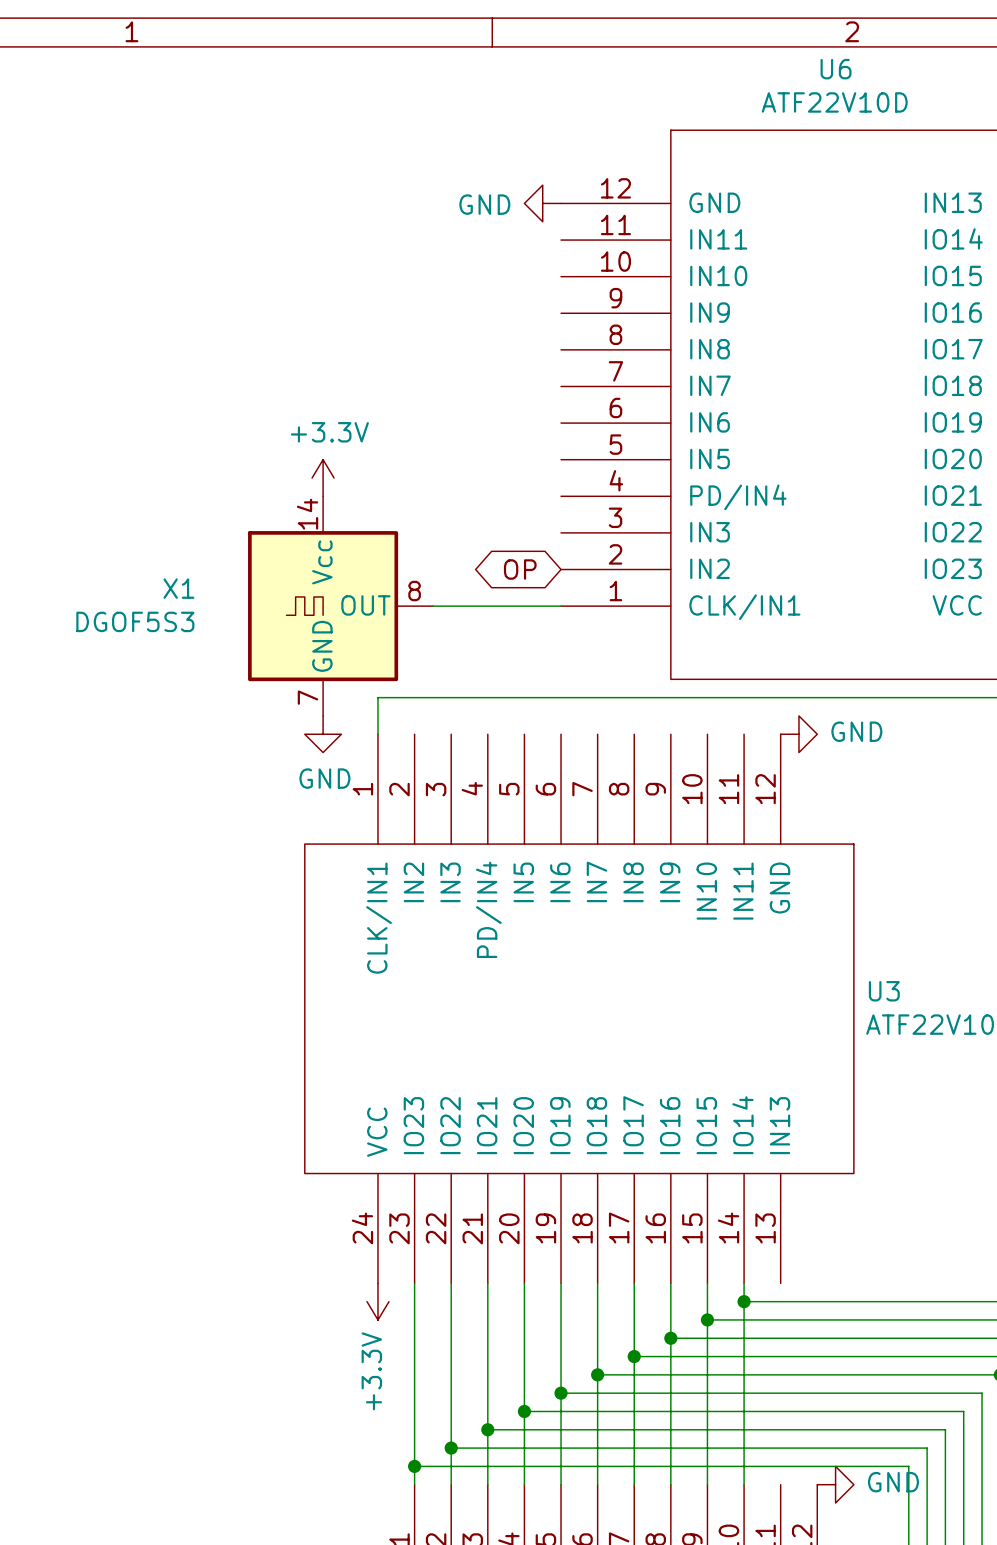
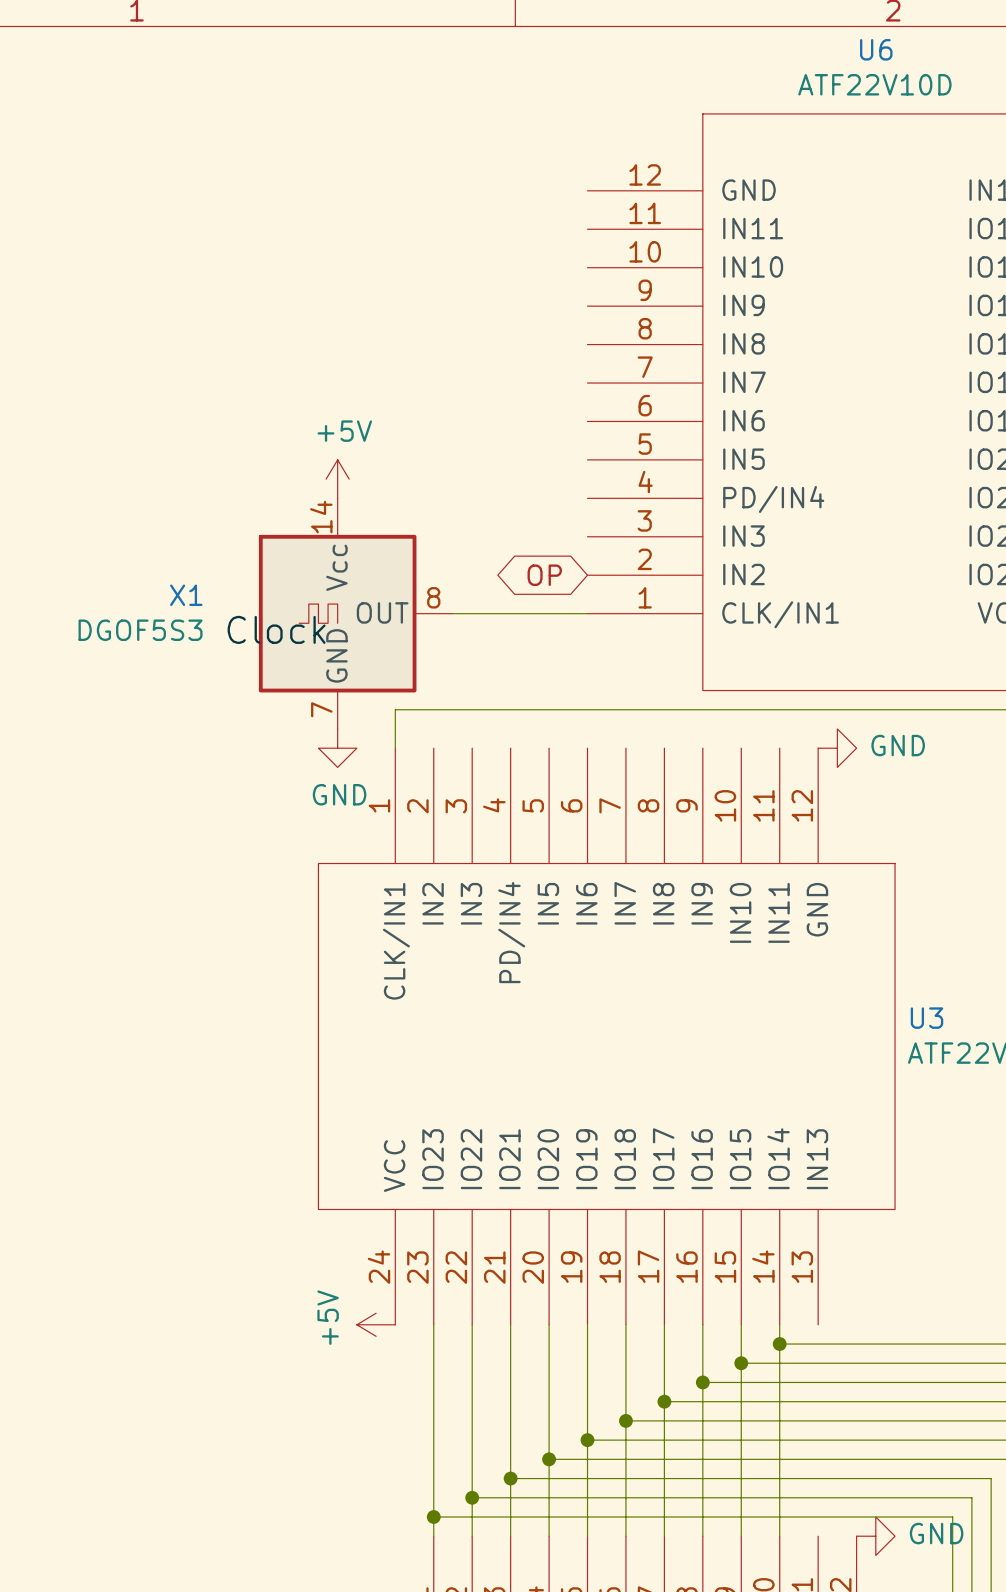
power symbol: GND (542, 203) -> none
power symbol: +3.3V (323, 477) -> +5V (337, 479)
label: none -> Clock (276, 629)
power symbol: none -> +5V (376, 1324)
power symbol: +3.3V (377, 1301) -> none

